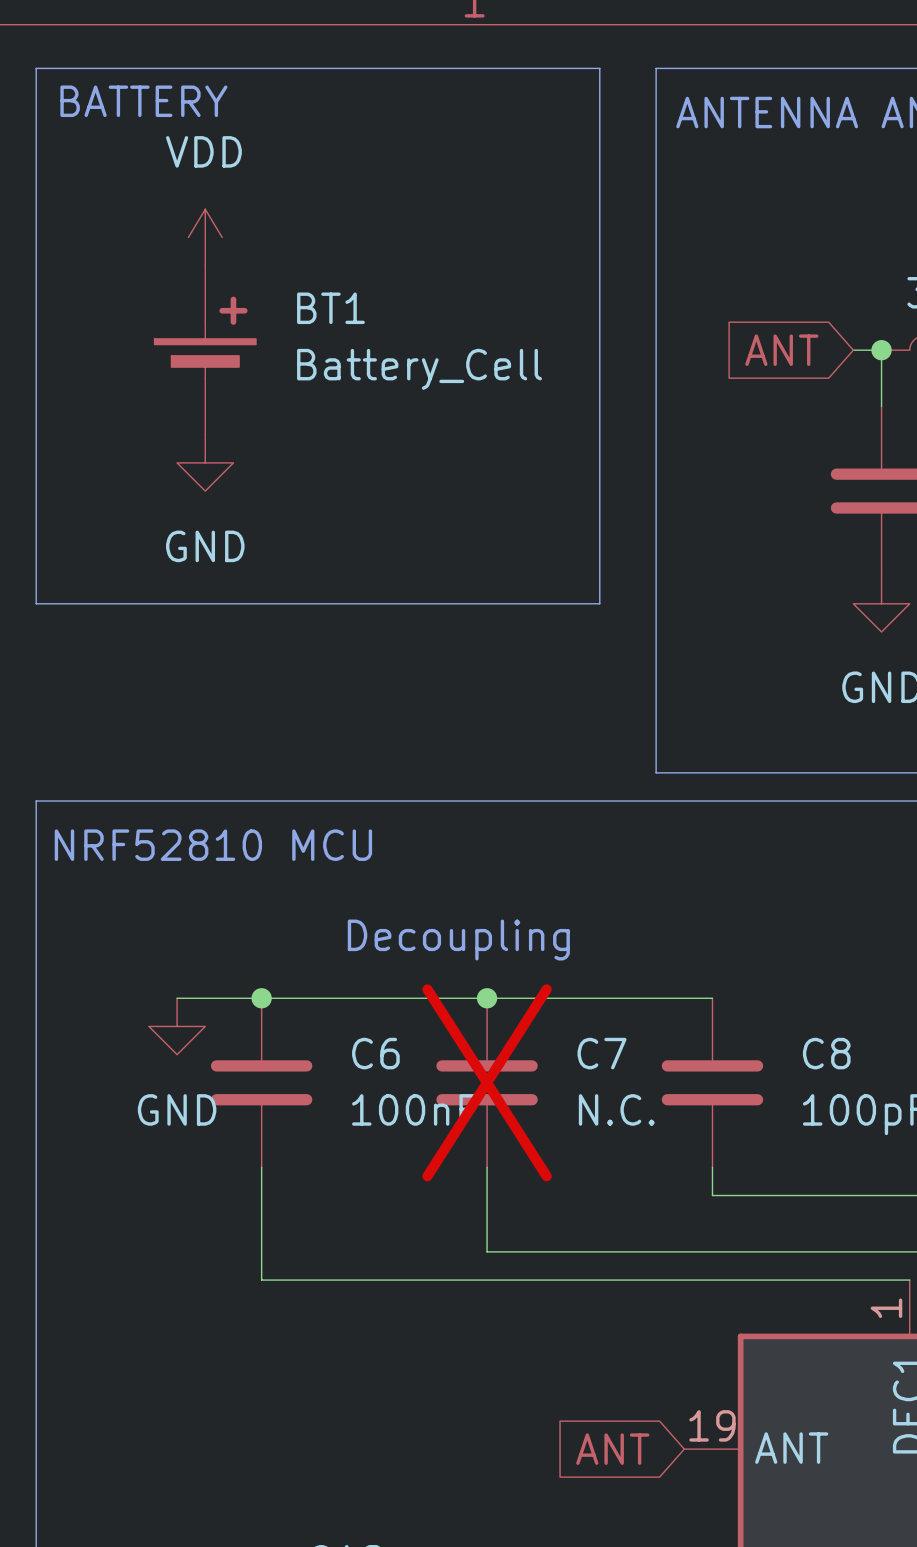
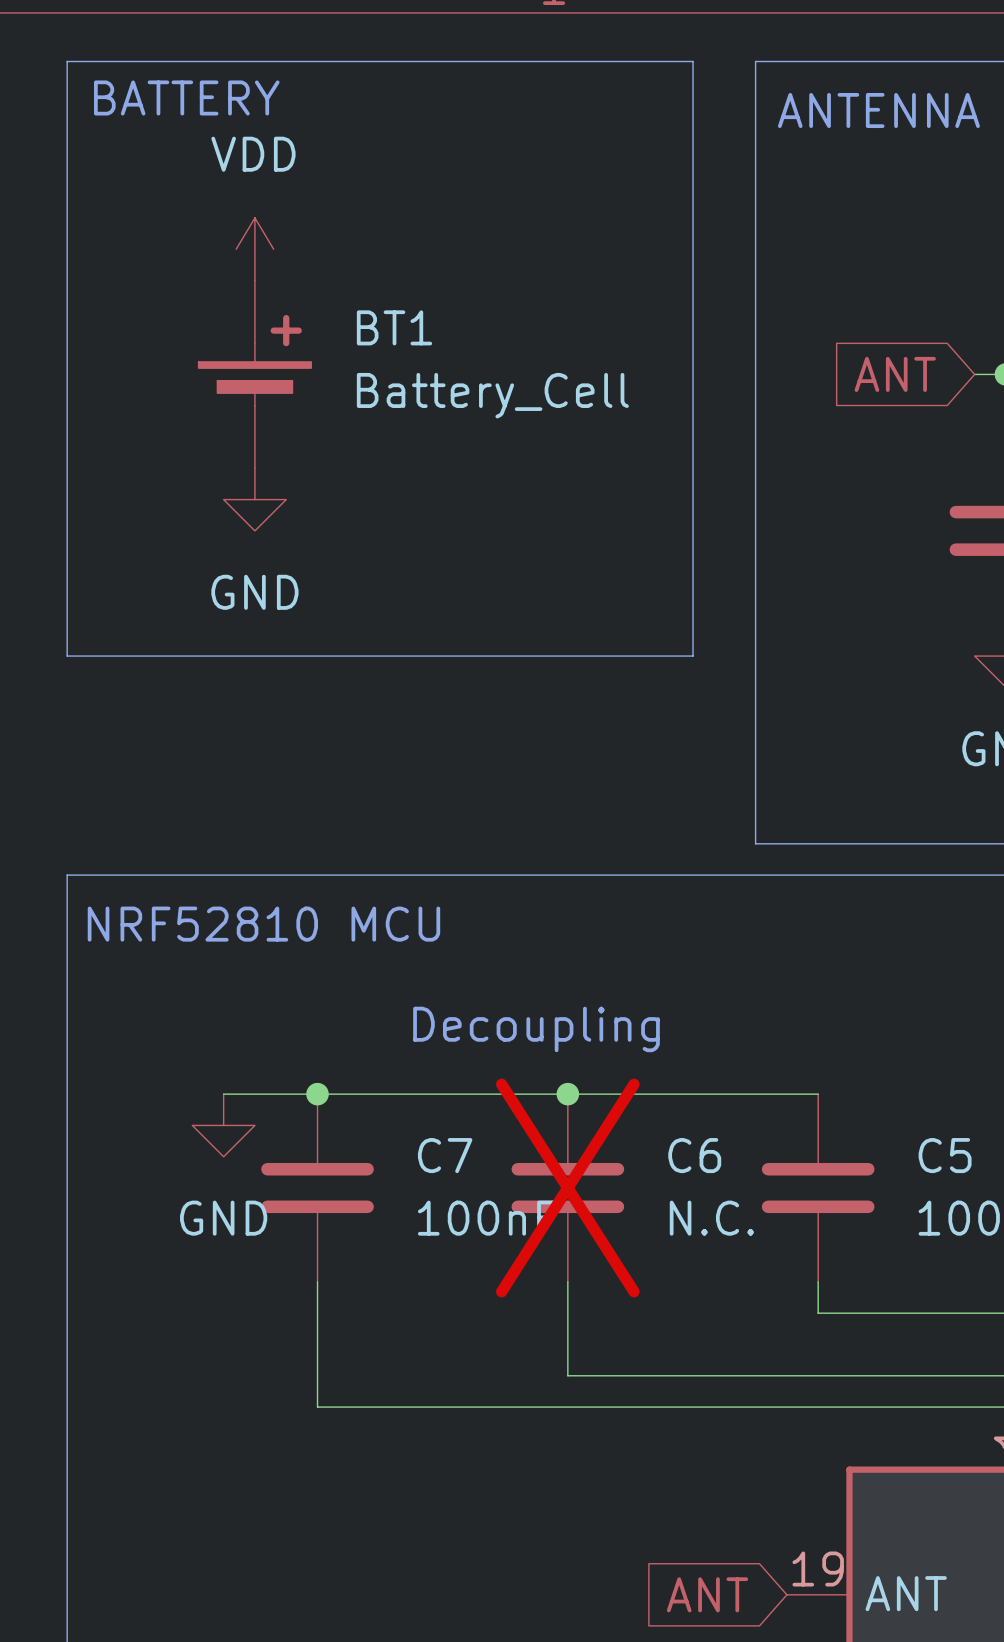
C6 name: C6 (375, 1053) -> C7 (445, 1155)
C7 name: C7 (601, 1053) -> C6 (694, 1155)
C8 name: C8 (826, 1053) -> C5 (945, 1155)

